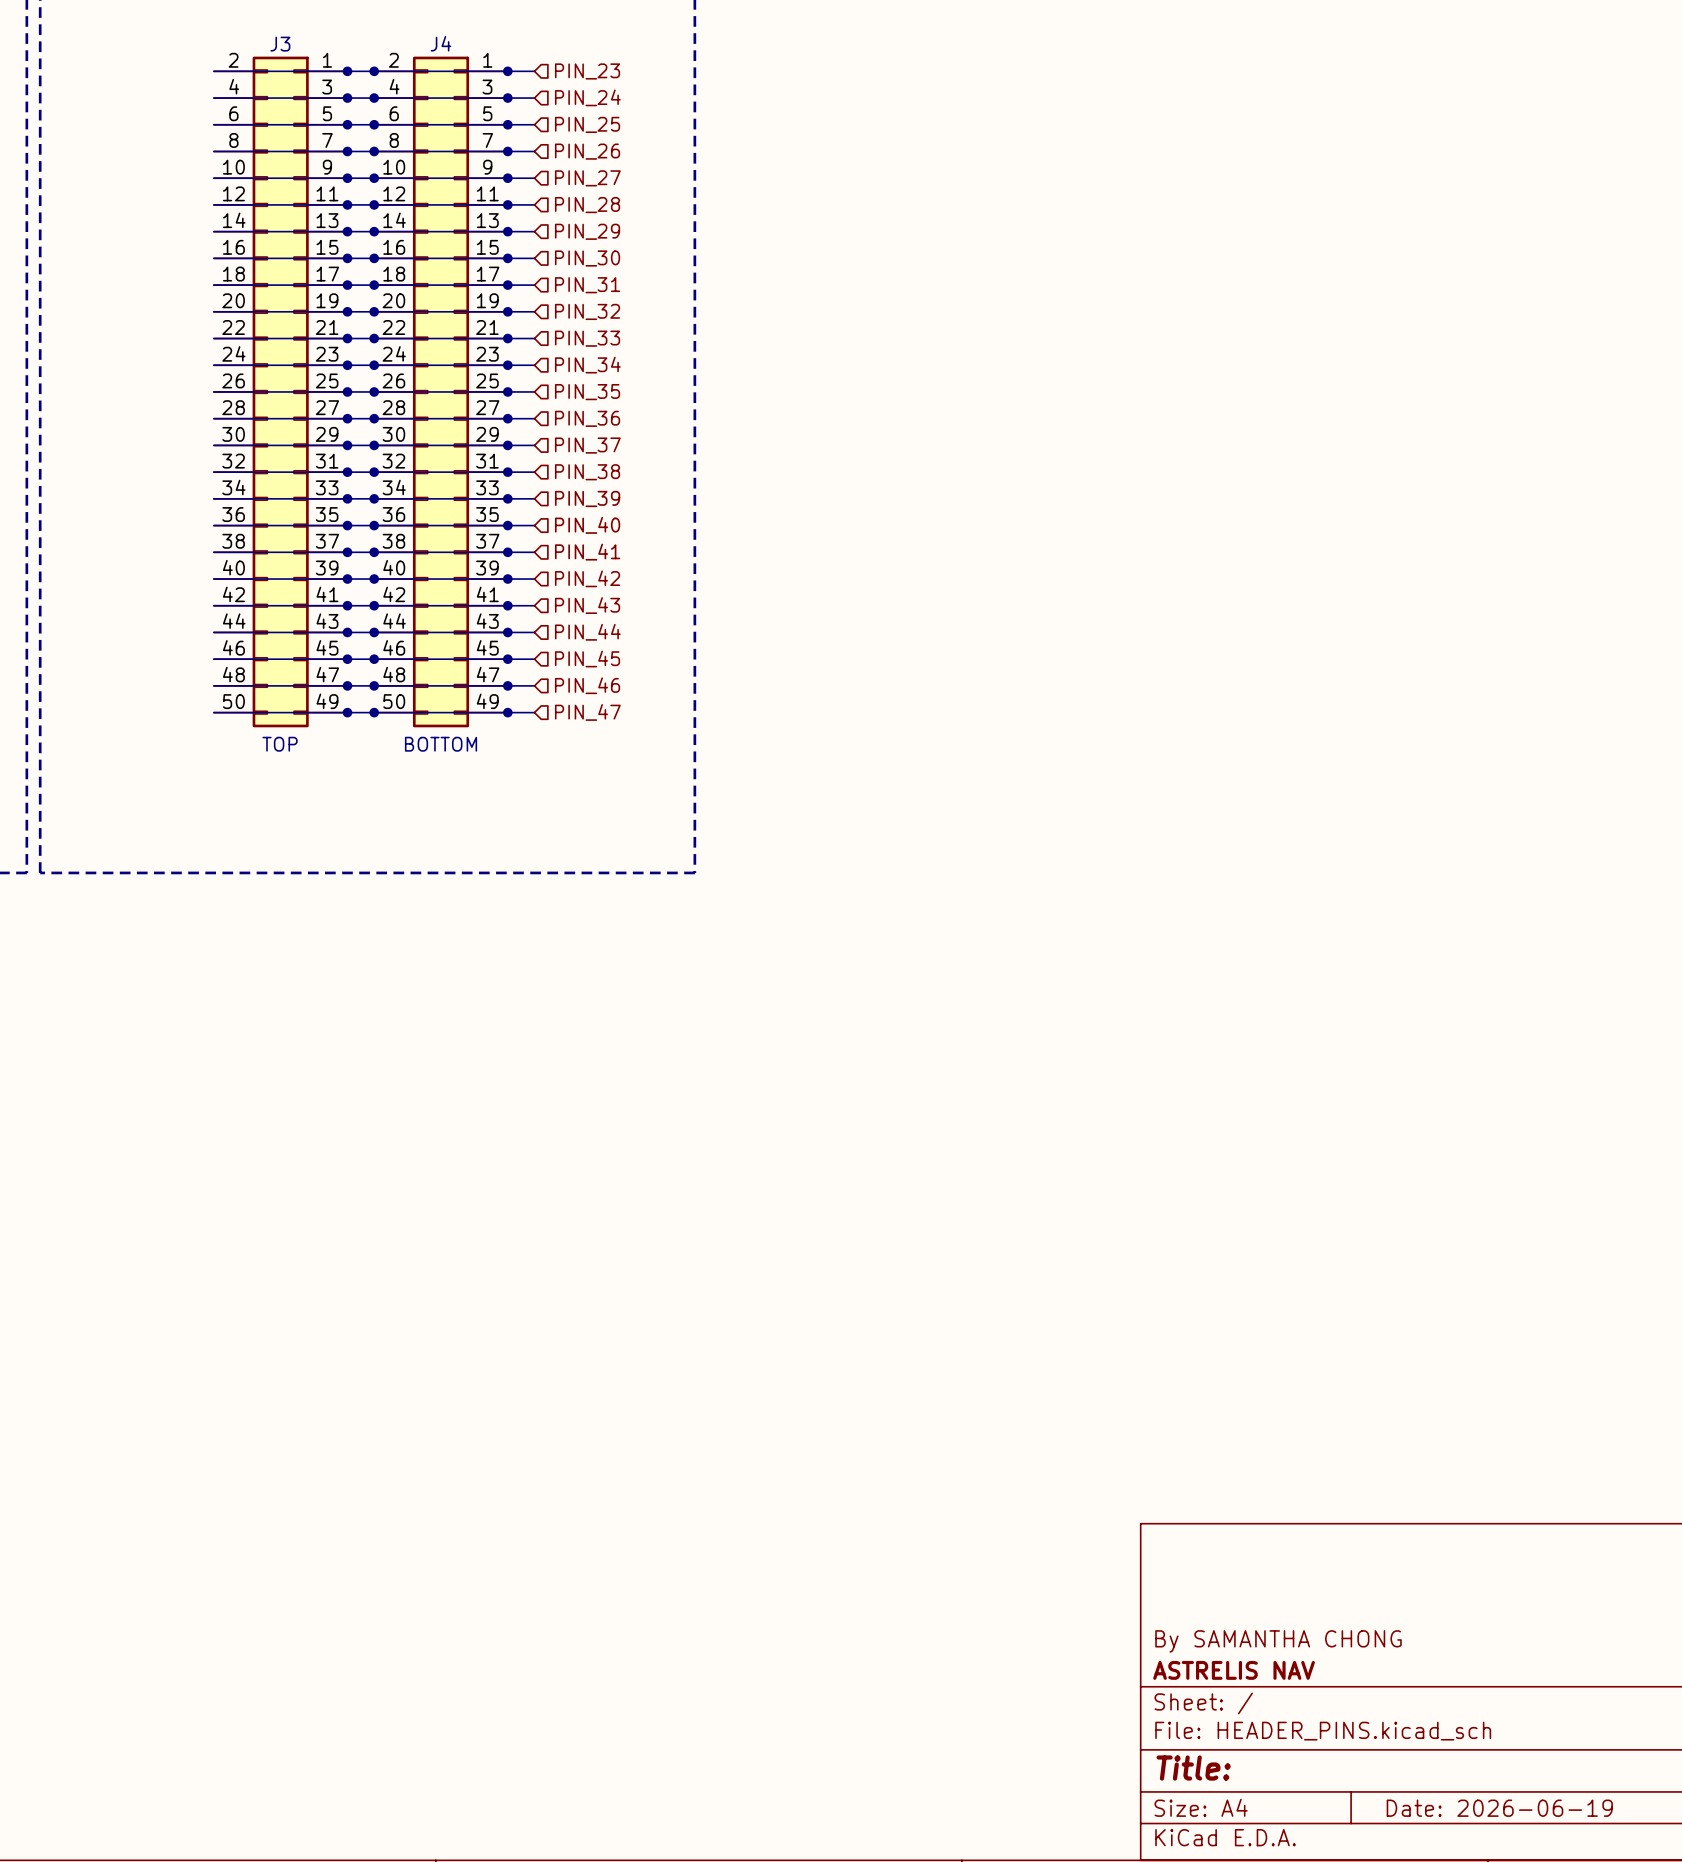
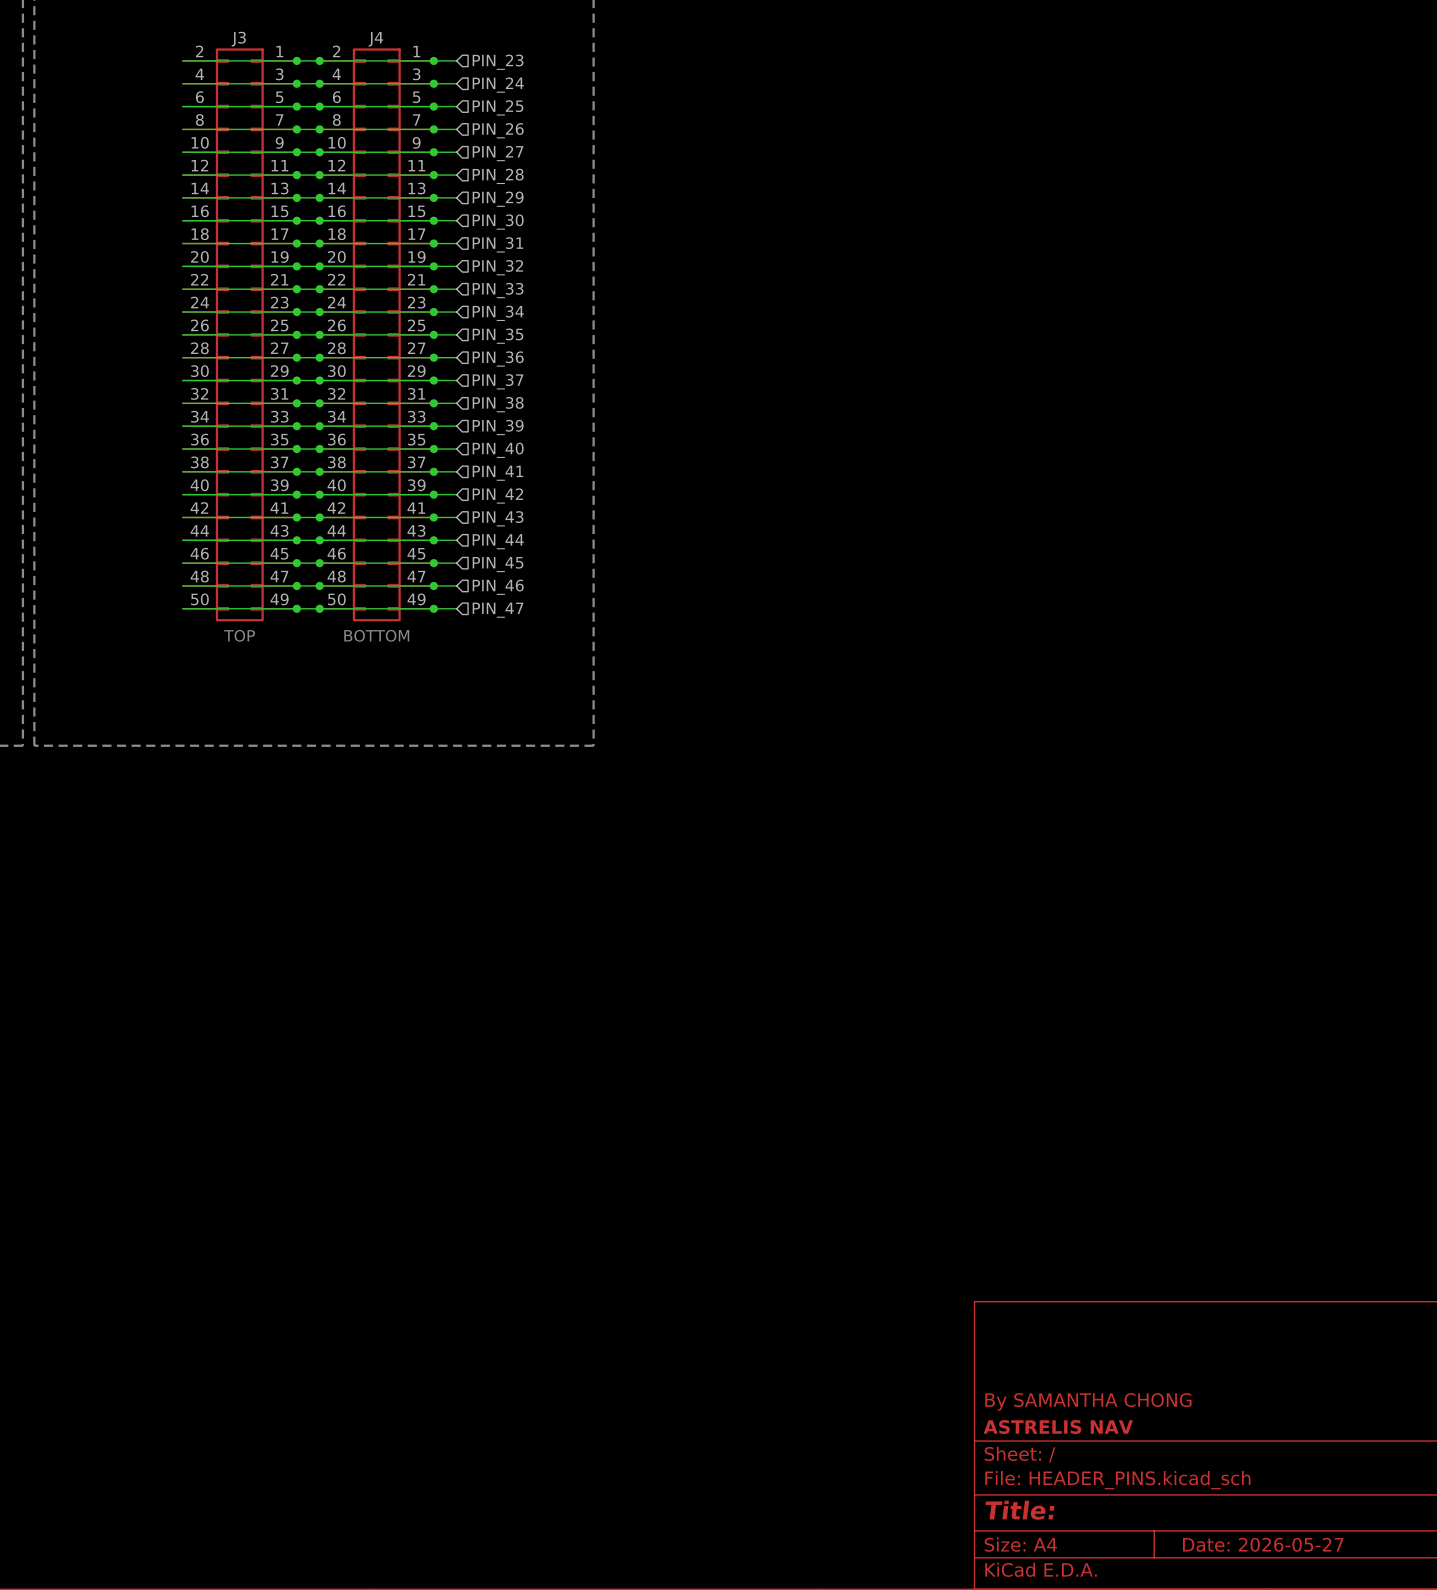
title block: Date: 2026-06-19 (1499, 1808) -> Date: 2026-05-27 (1263, 1544)

